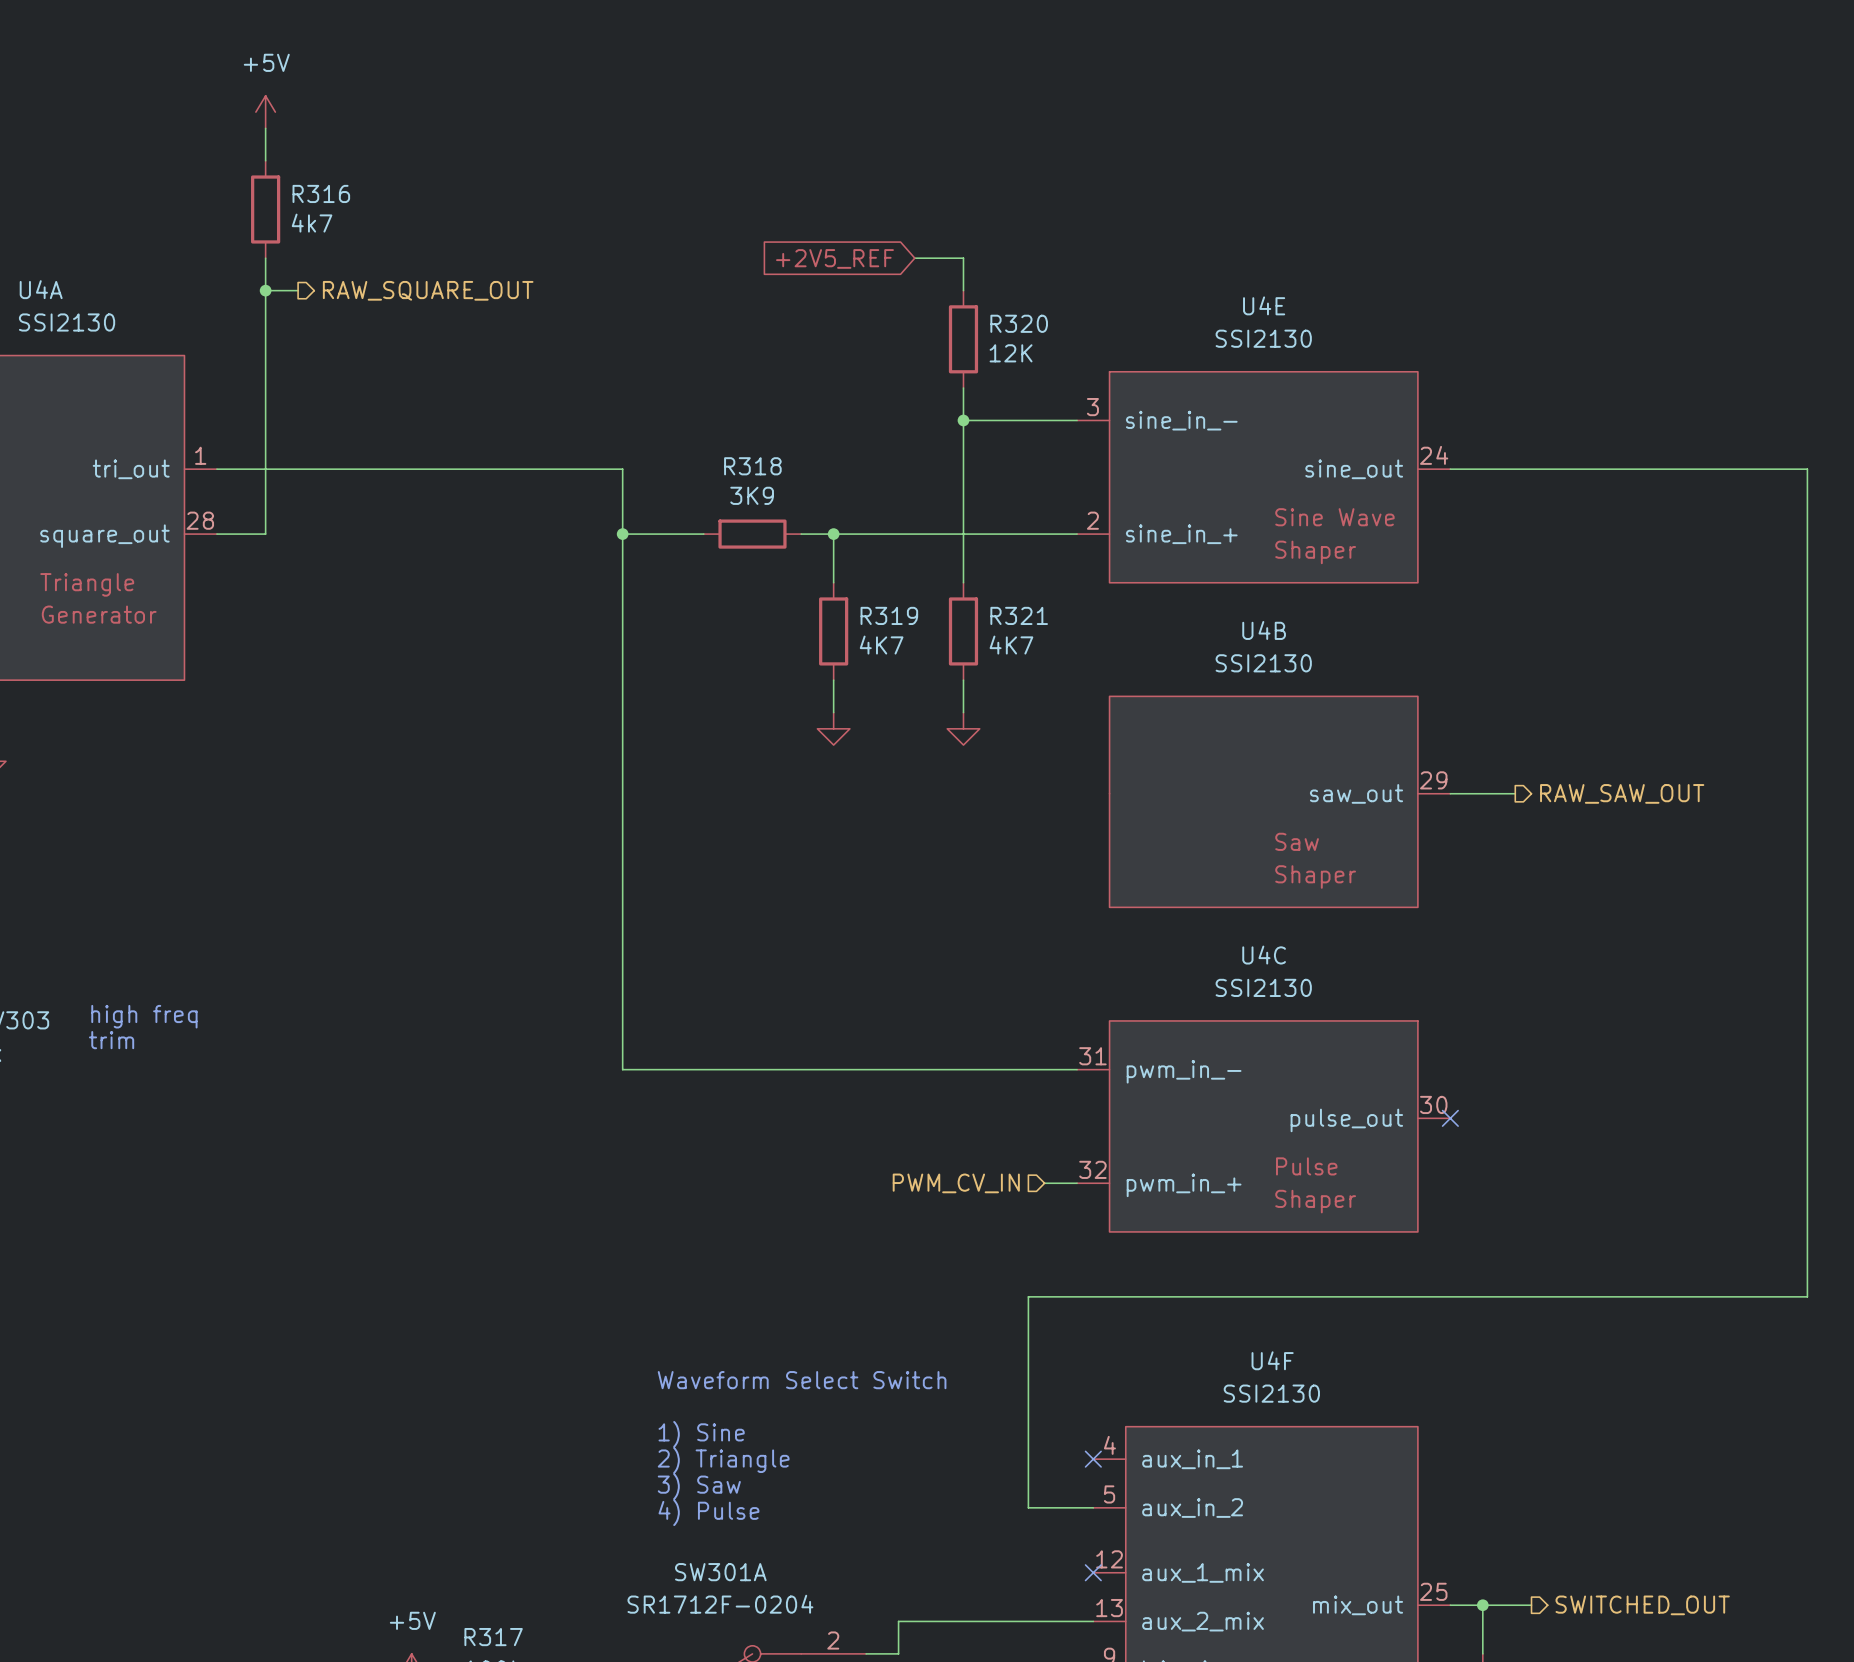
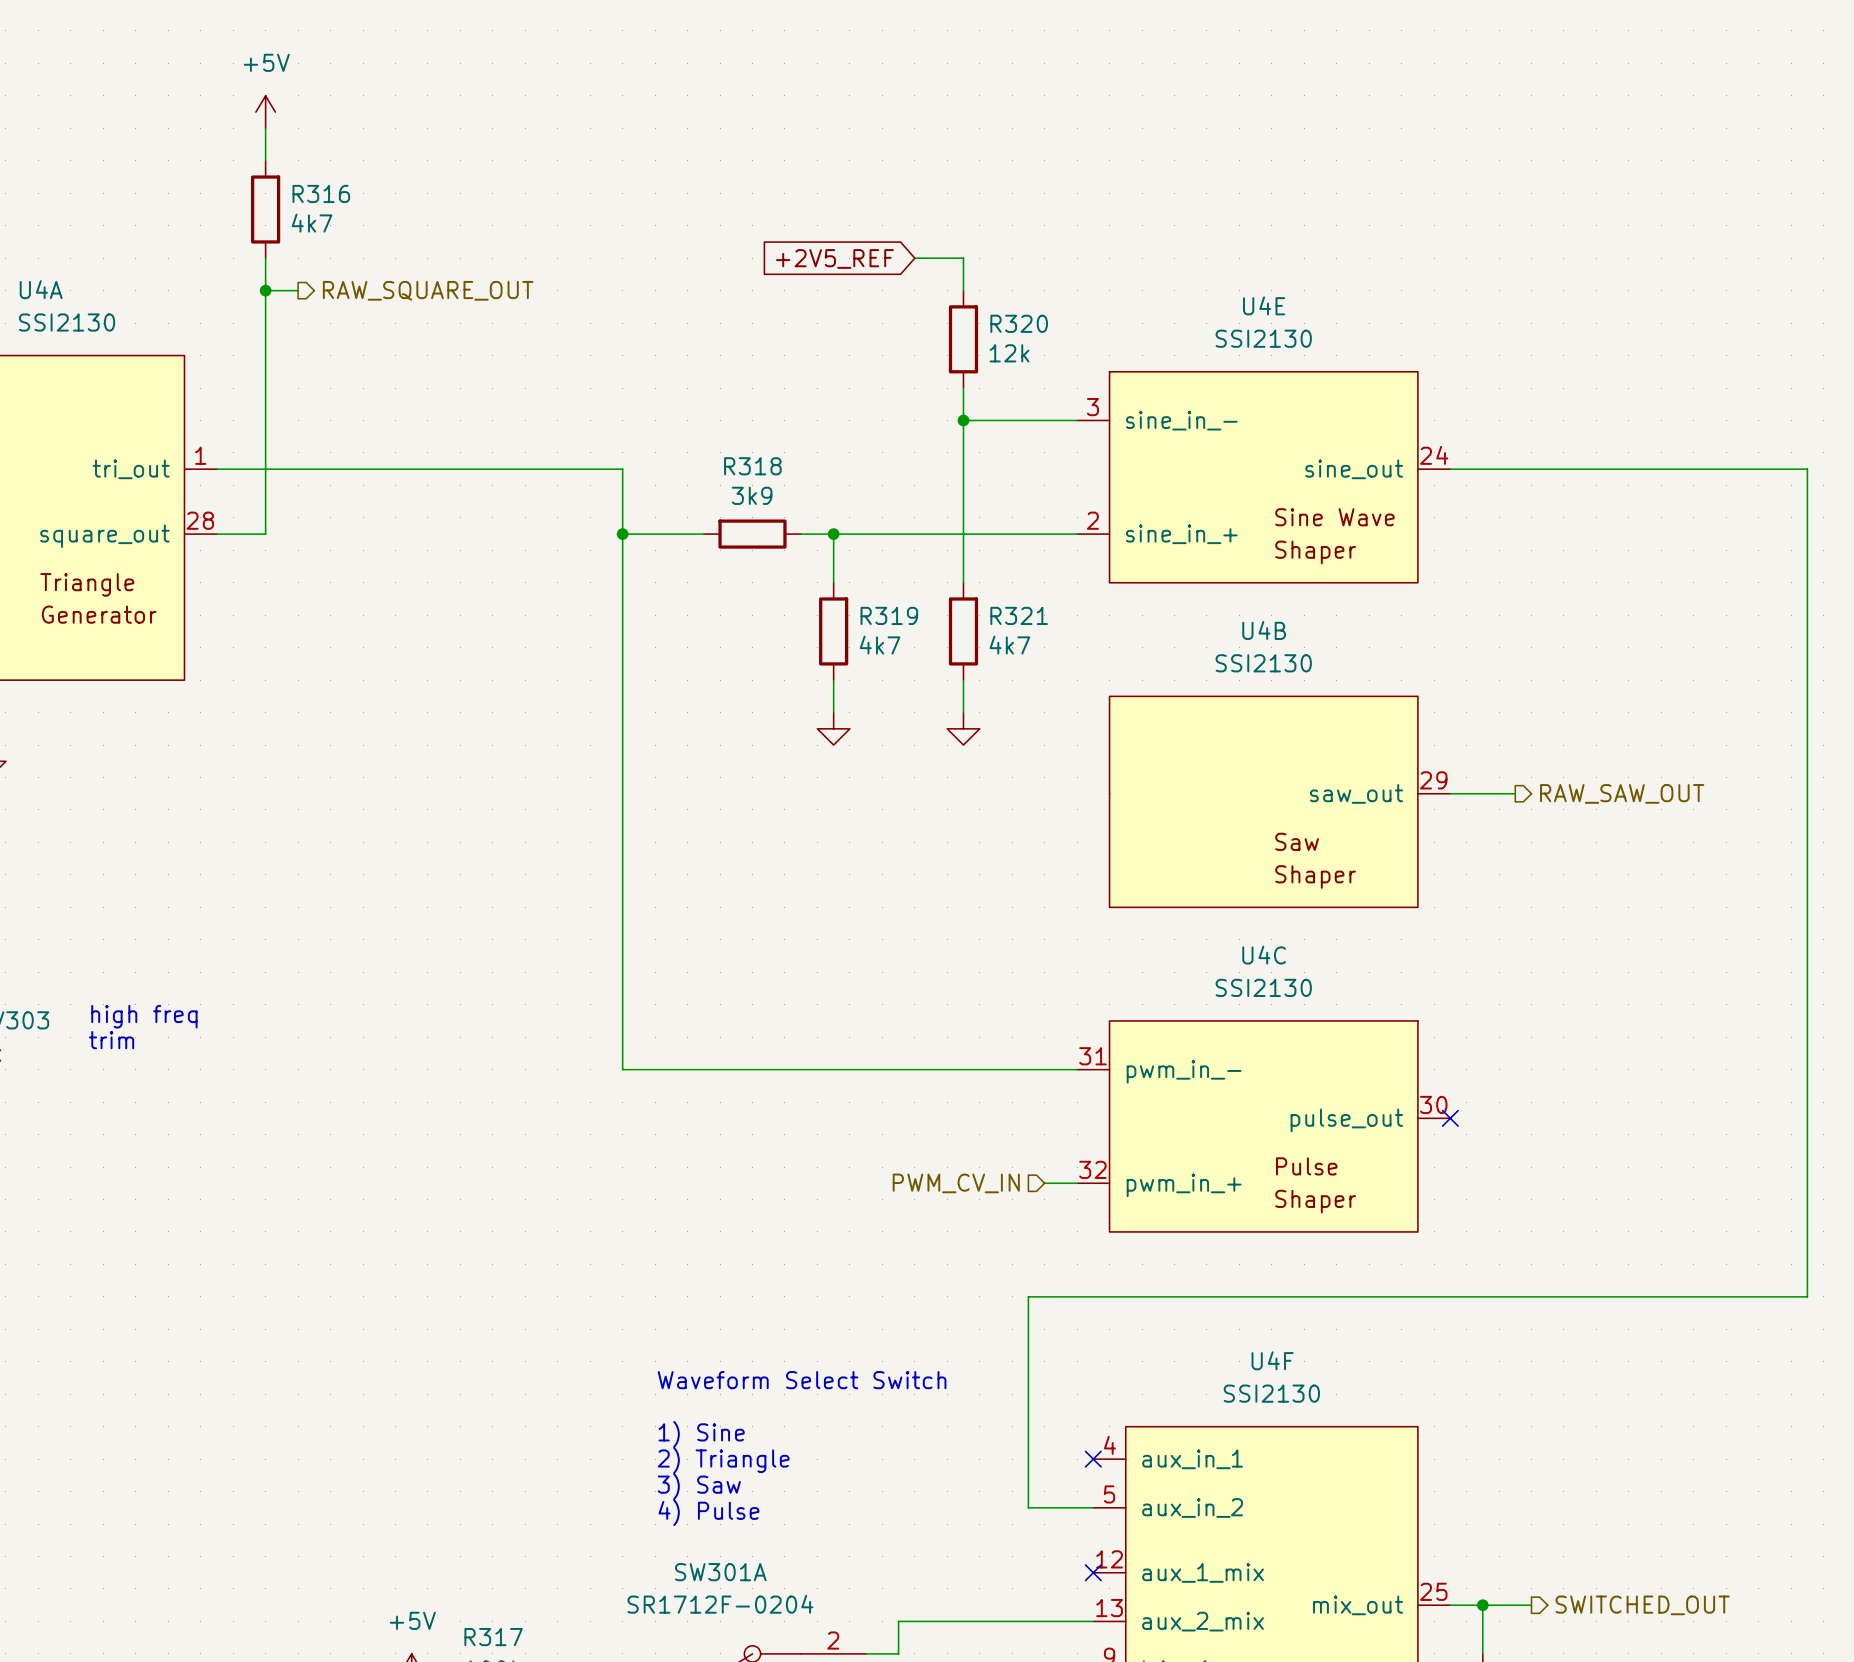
R320 value: 12K (1011, 353) -> 12k (1009, 353)
R318 value: 3K9 (752, 495) -> 3k9 (752, 495)
R319 value: 4K7 (881, 645) -> 4k7 (880, 645)
R321 value: 4K7 (1011, 645) -> 4k7 (1009, 645)

